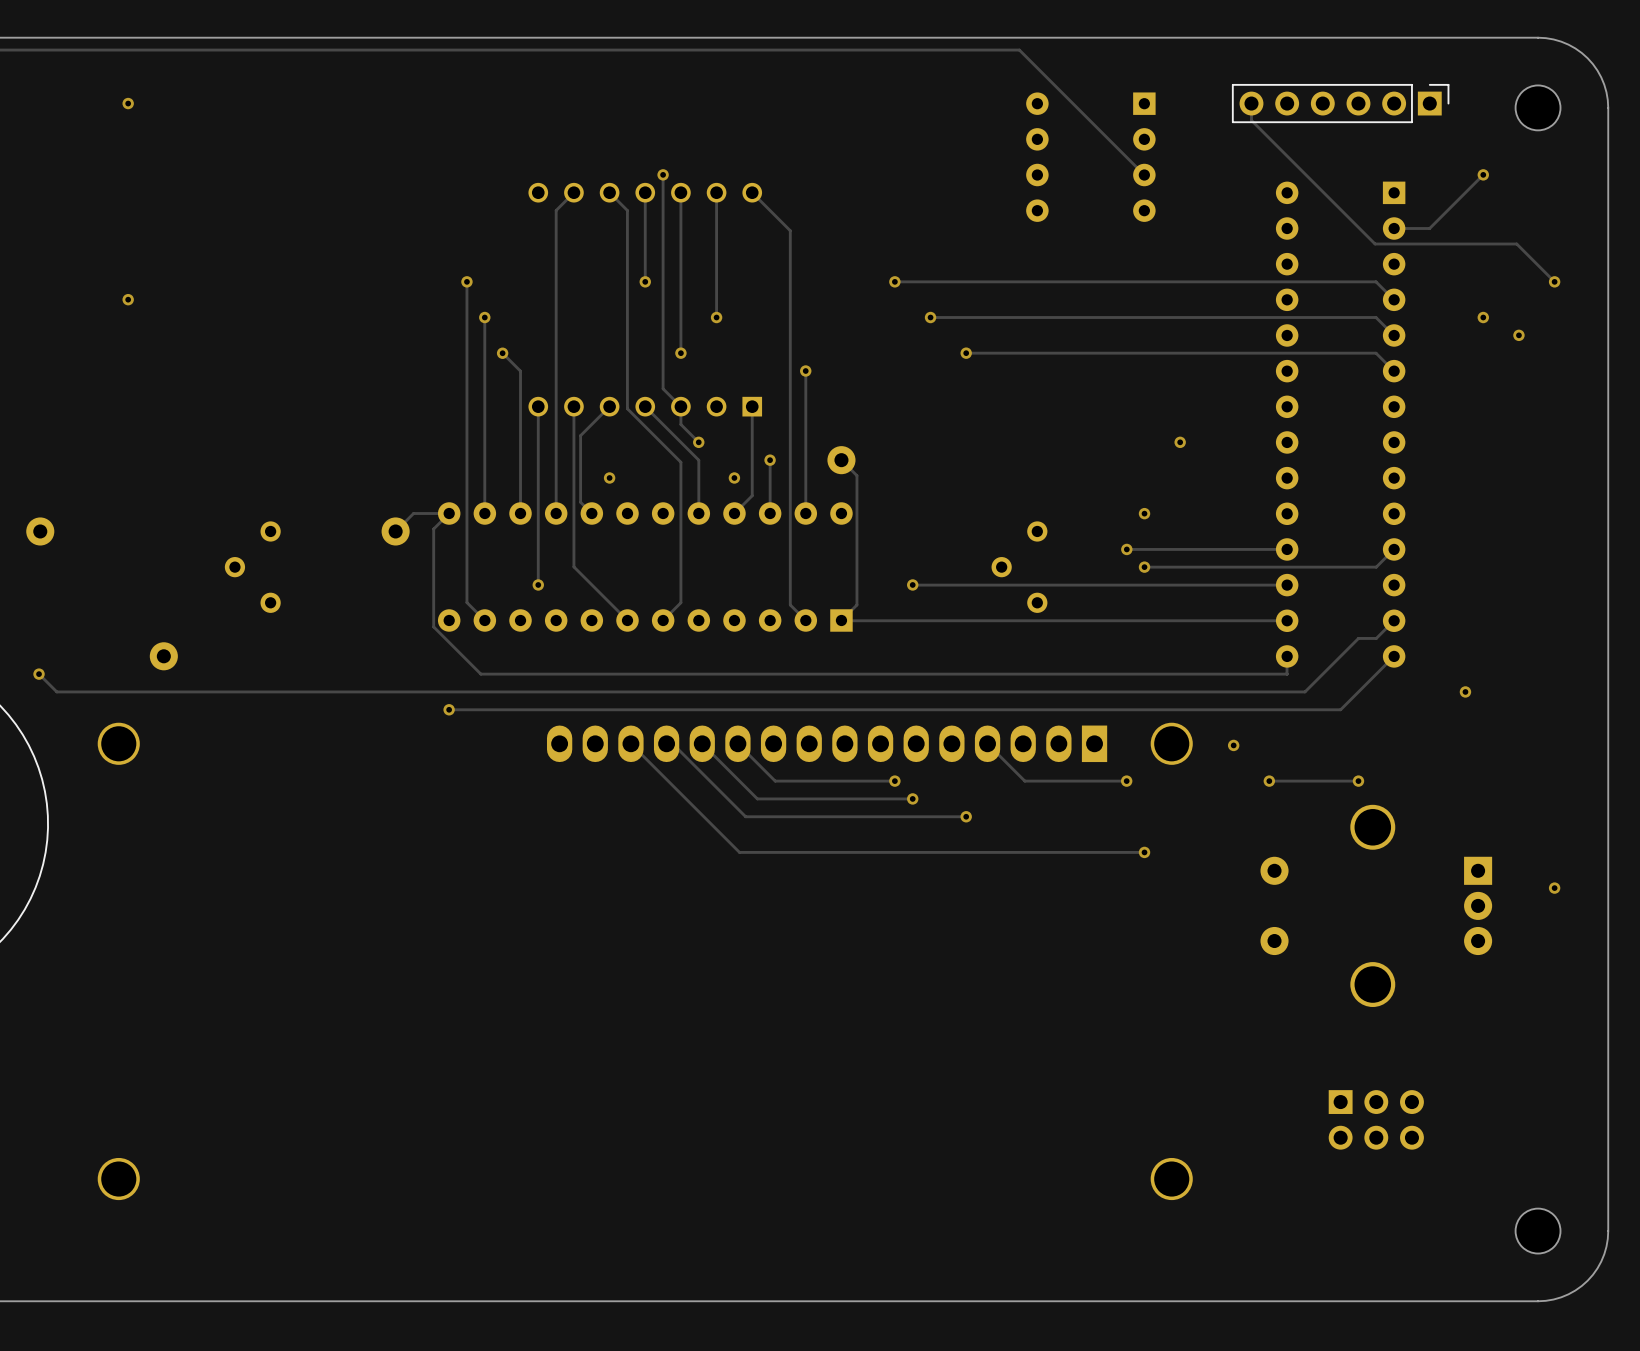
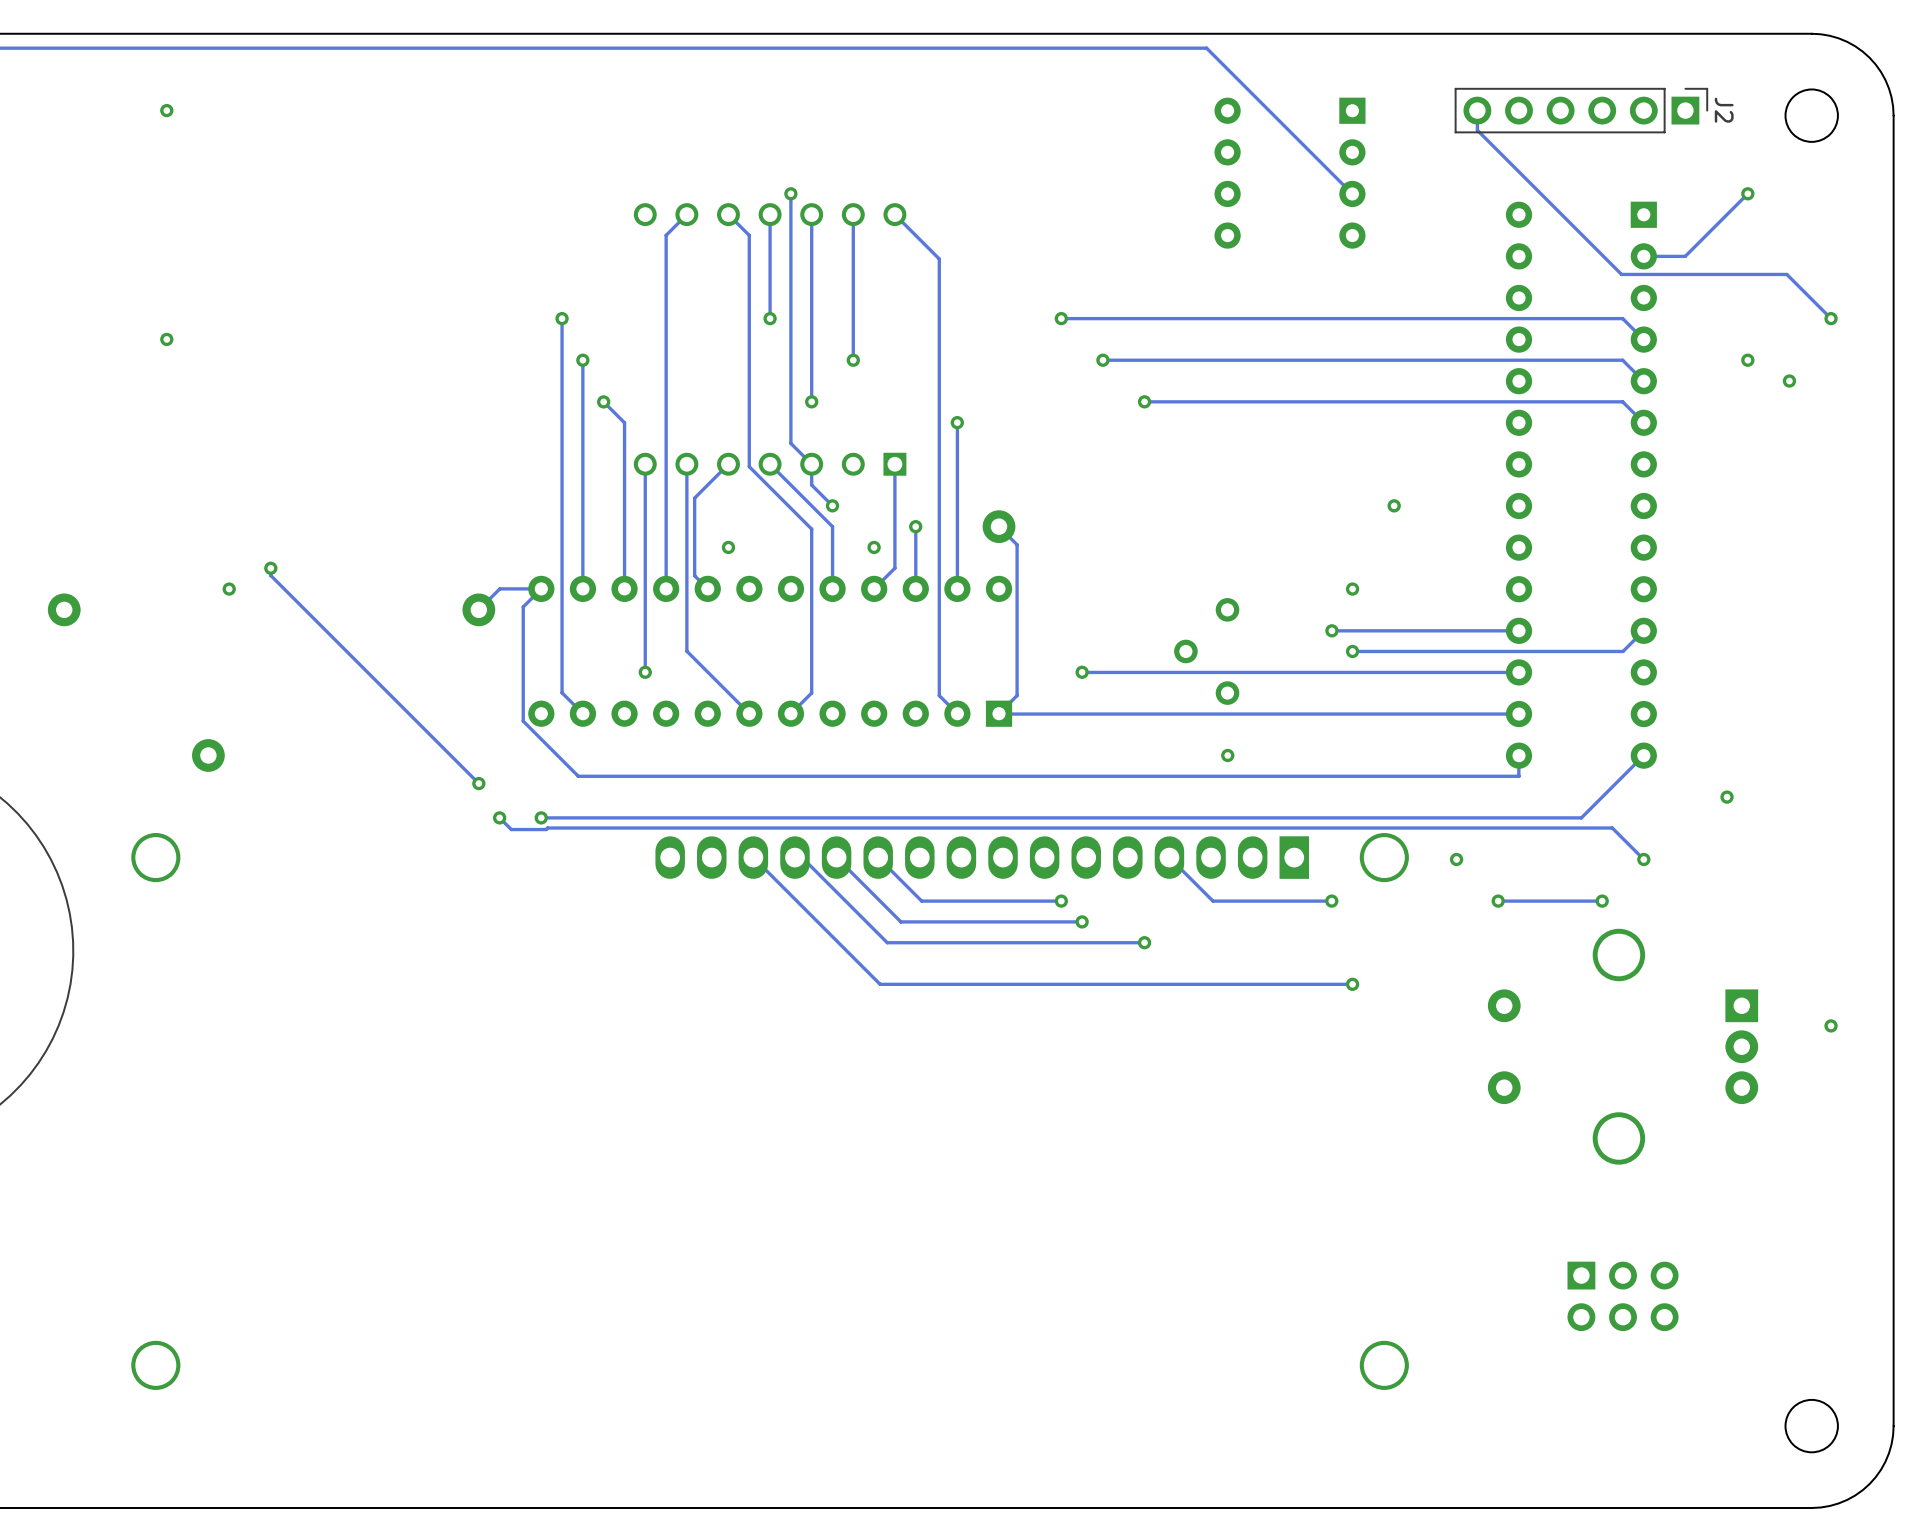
J2 name: none -> J2 (1724, 110)
track: none -> (270, 568) (270, 575) (478, 783)
via: none -> (270, 568)
via: none -> (229, 589)
part: (252, 567) -> none
track: (1393, 620) (1376, 638) (1358, 638) (1304, 691) (56, 691) (39, 674) -> none
via: none -> (1227, 755)
via: (39, 674) -> none
via: none -> (478, 783)
track: none -> (499, 817) (511, 829) (1612, 828) (1643, 859)
via: none -> (499, 817)
via: none -> (1643, 859)

